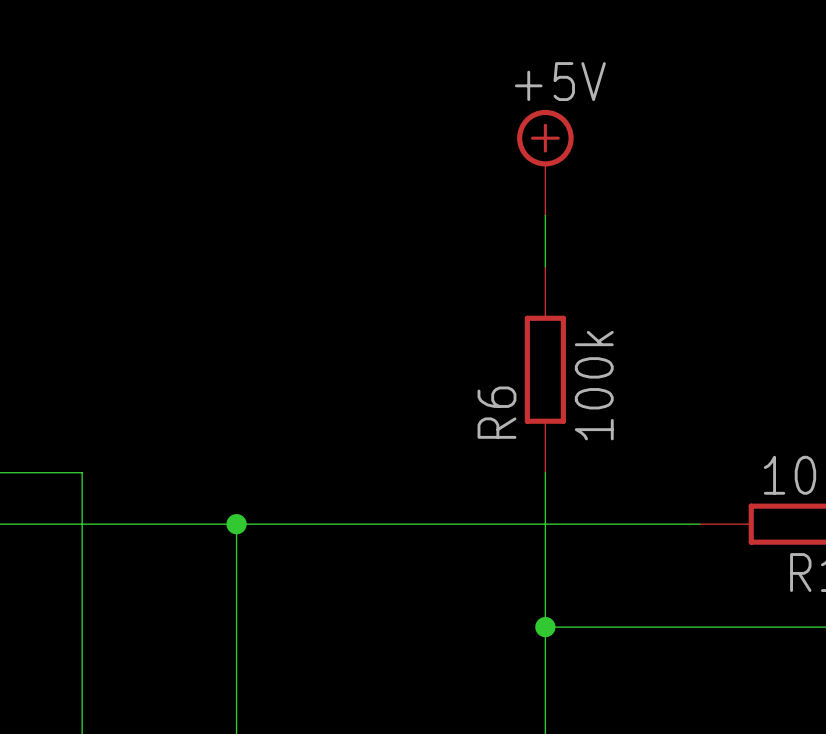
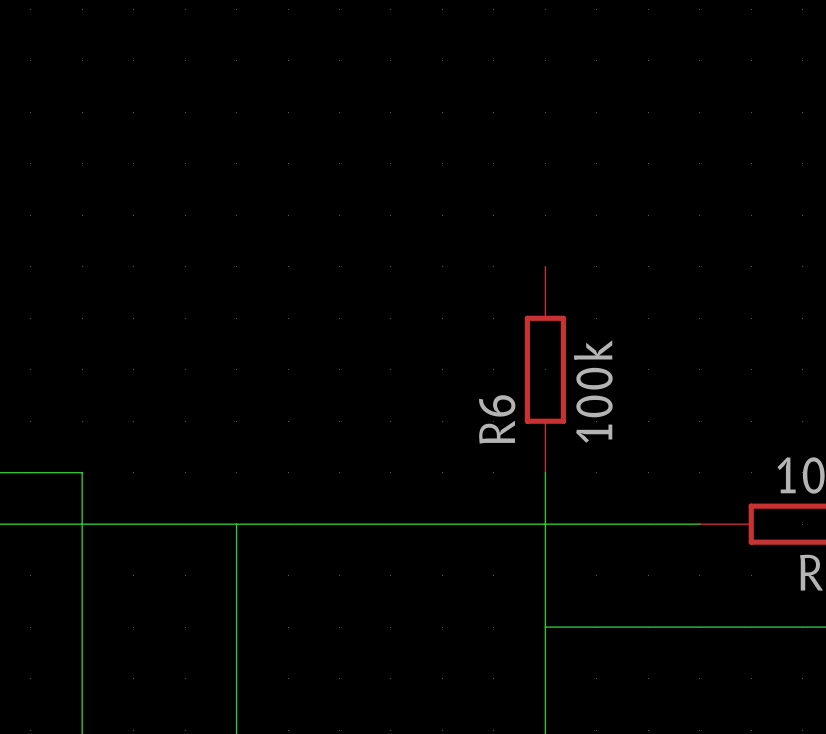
power symbol: +5V (545, 162) -> none
wire: (545, 215) (545, 266) -> none
junction: (236, 524) -> none
junction: (545, 627) -> none

